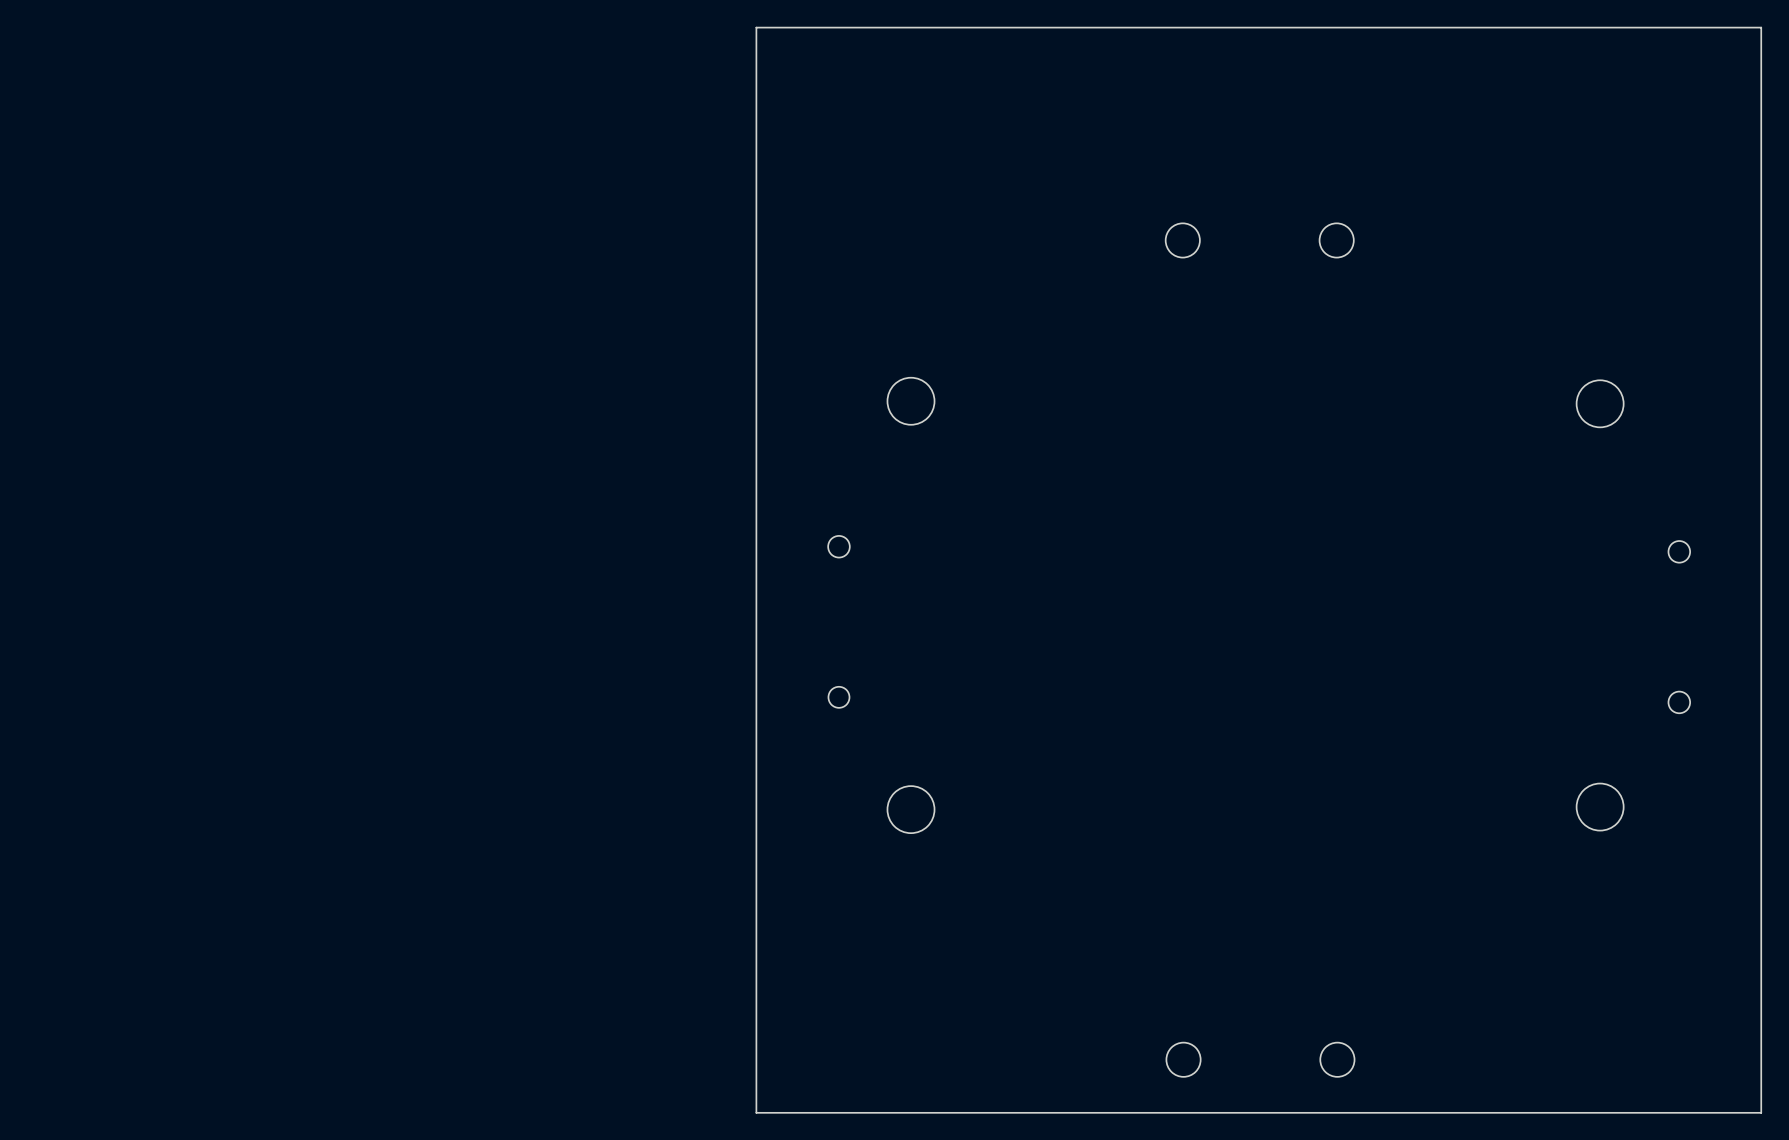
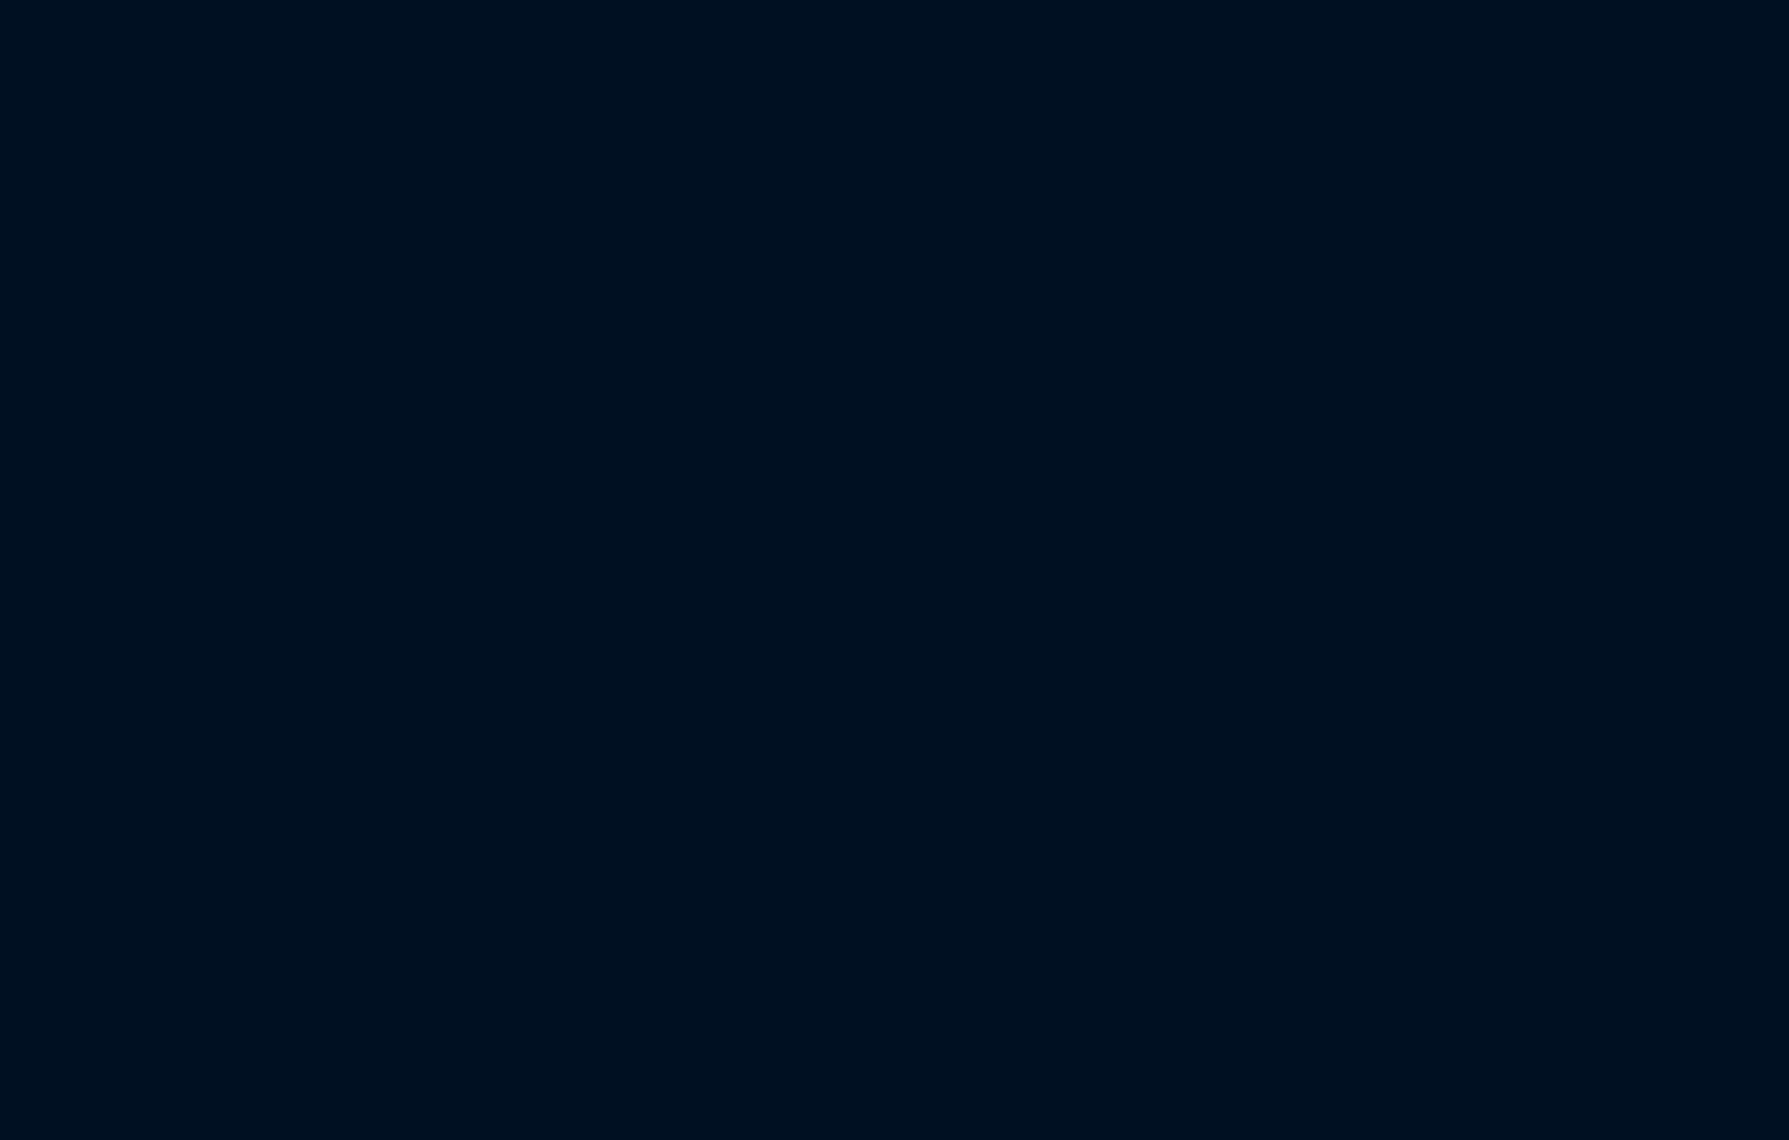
board edge: (1761, 27) (756, 27) (756, 1112) (1761, 1112) (1761, 27) -> none
round board edge: [1165, 223, 1201, 258] -> none
round board edge: [1319, 223, 1355, 258] -> none
round board edge: [887, 377, 935, 426] -> none
round board edge: [1576, 380, 1624, 428] -> none
round board edge: [827, 535, 851, 558] -> none
round board edge: [1668, 540, 1691, 563] -> none
round board edge: [828, 686, 850, 709] -> none
round board edge: [1668, 691, 1691, 714] -> none
round board edge: [1576, 783, 1624, 831] -> none
round board edge: [887, 785, 935, 834] -> none
round board edge: [1166, 1042, 1201, 1078] -> none
round board edge: [1320, 1042, 1355, 1078] -> none

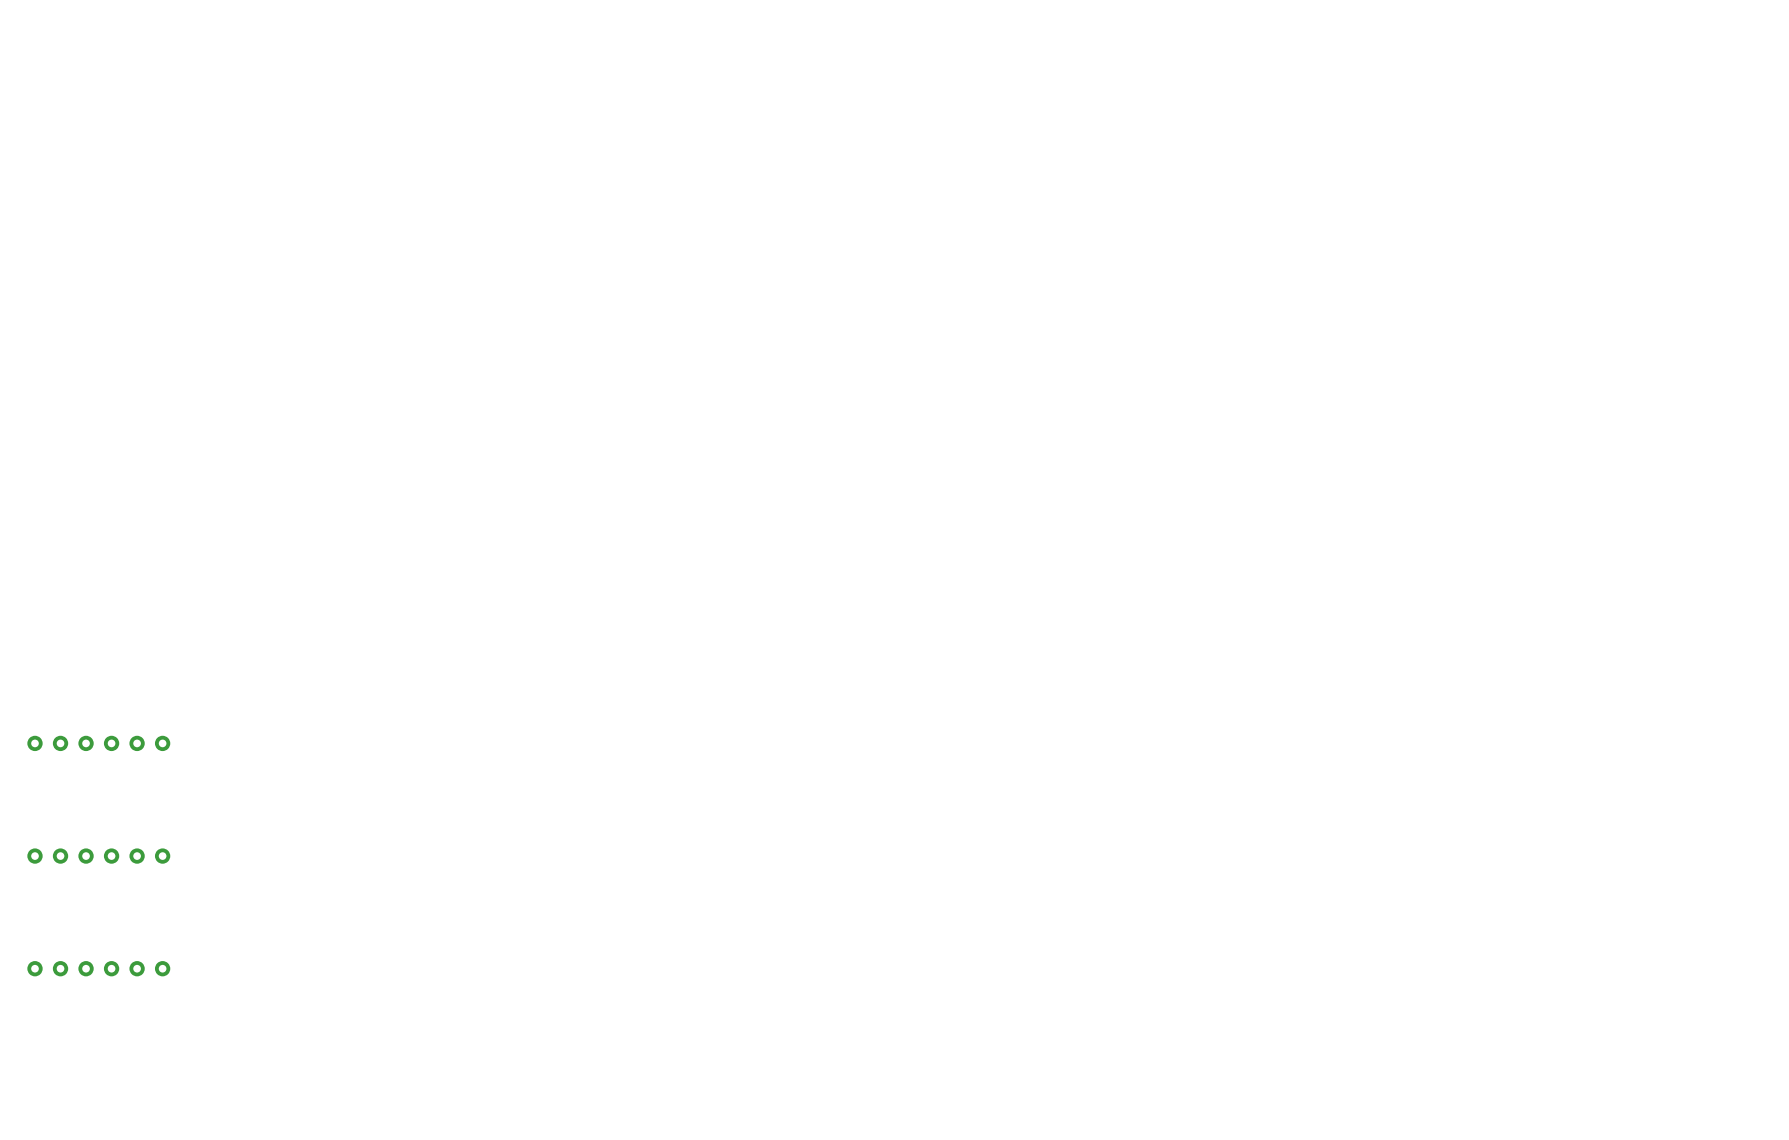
part: none -> (98, 743)
part: none -> (98, 856)
part: none -> (98, 968)

